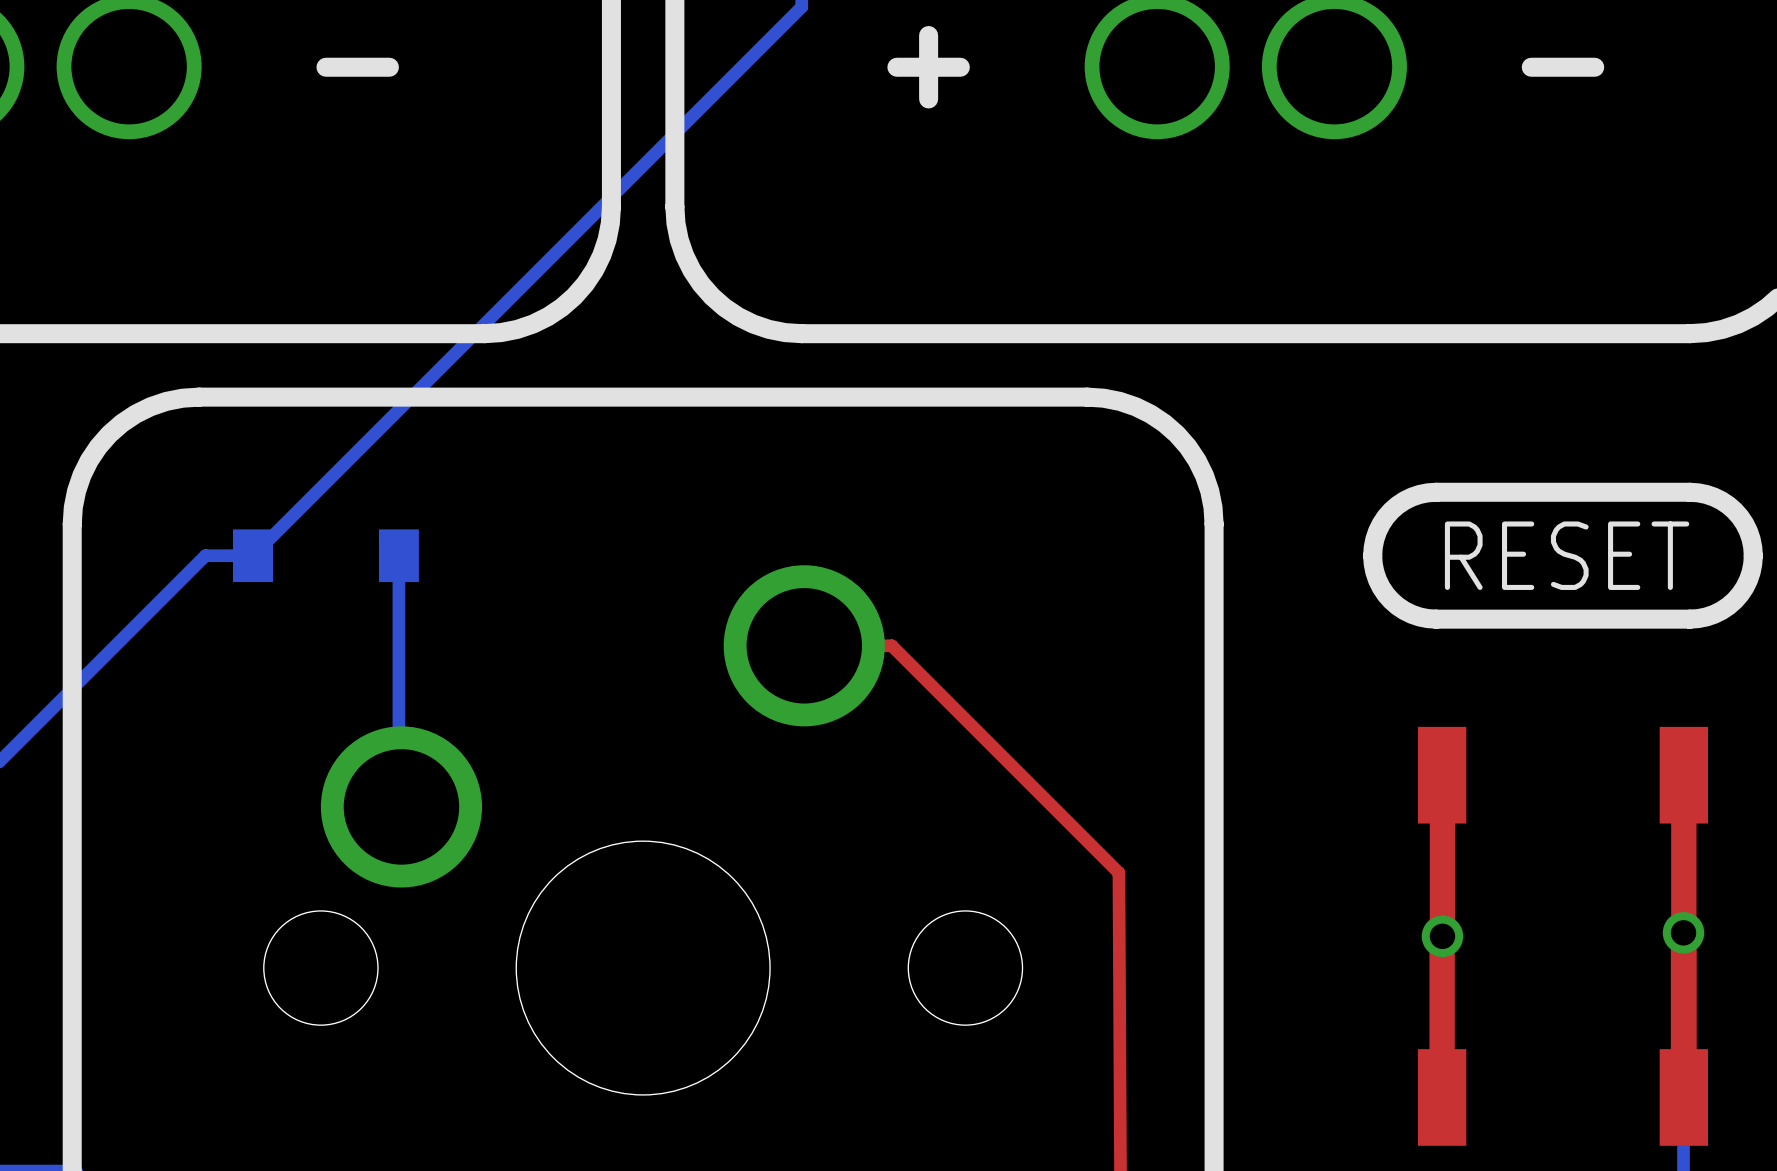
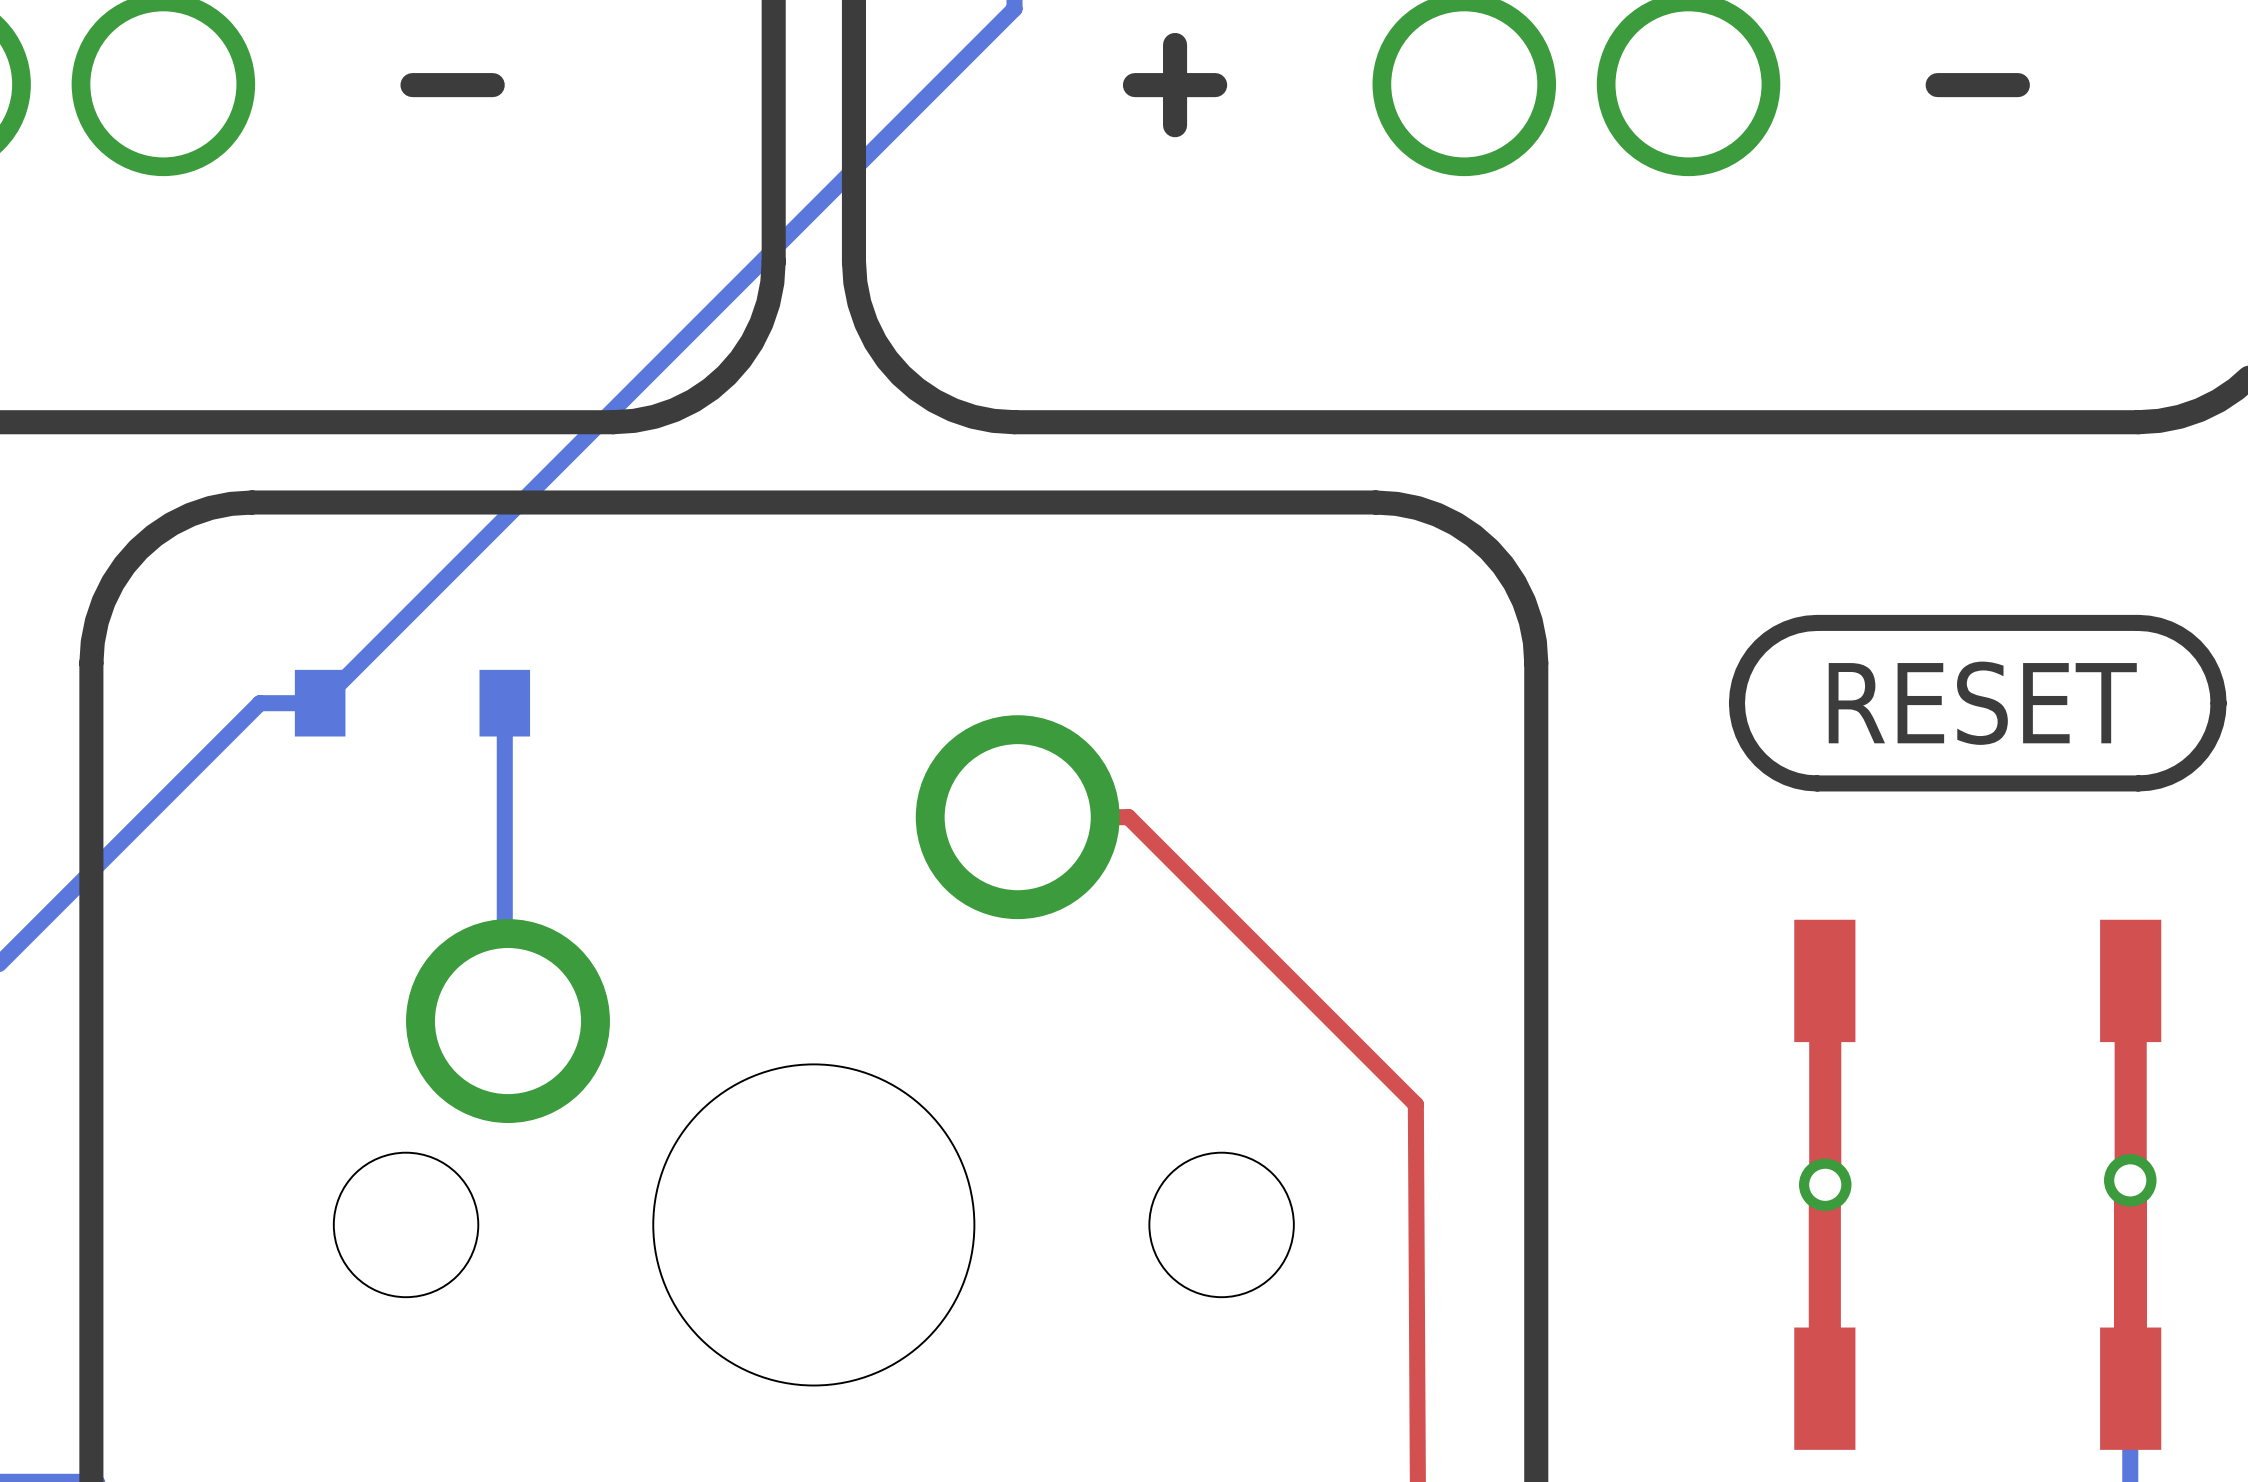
line width: thick (1436, 492) (1689, 492) (1706, 494) (1728, 505) (1744, 523) (1752, 547) (1751, 572) (1740, 594) (1728, 606) (1714, 614) (1698, 618) (1436, 619) (1419, 616) (1397, 606) (1385, 594) (1374, 572) (1373, 547) (1381, 523) (1397, 505) (1411, 497) (1436, 492) -> thin (1817, 622) (2138, 622) (2159, 625) (2187, 639) (2207, 663) (2217, 692) (2215, 723) (2201, 752) (2187, 766) (2169, 777) (2148, 782) (1817, 783) (1796, 780) (1768, 766) (1753, 752) (1739, 723) (1737, 692) (1747, 663) (1768, 639) (1786, 629) (1817, 622)

